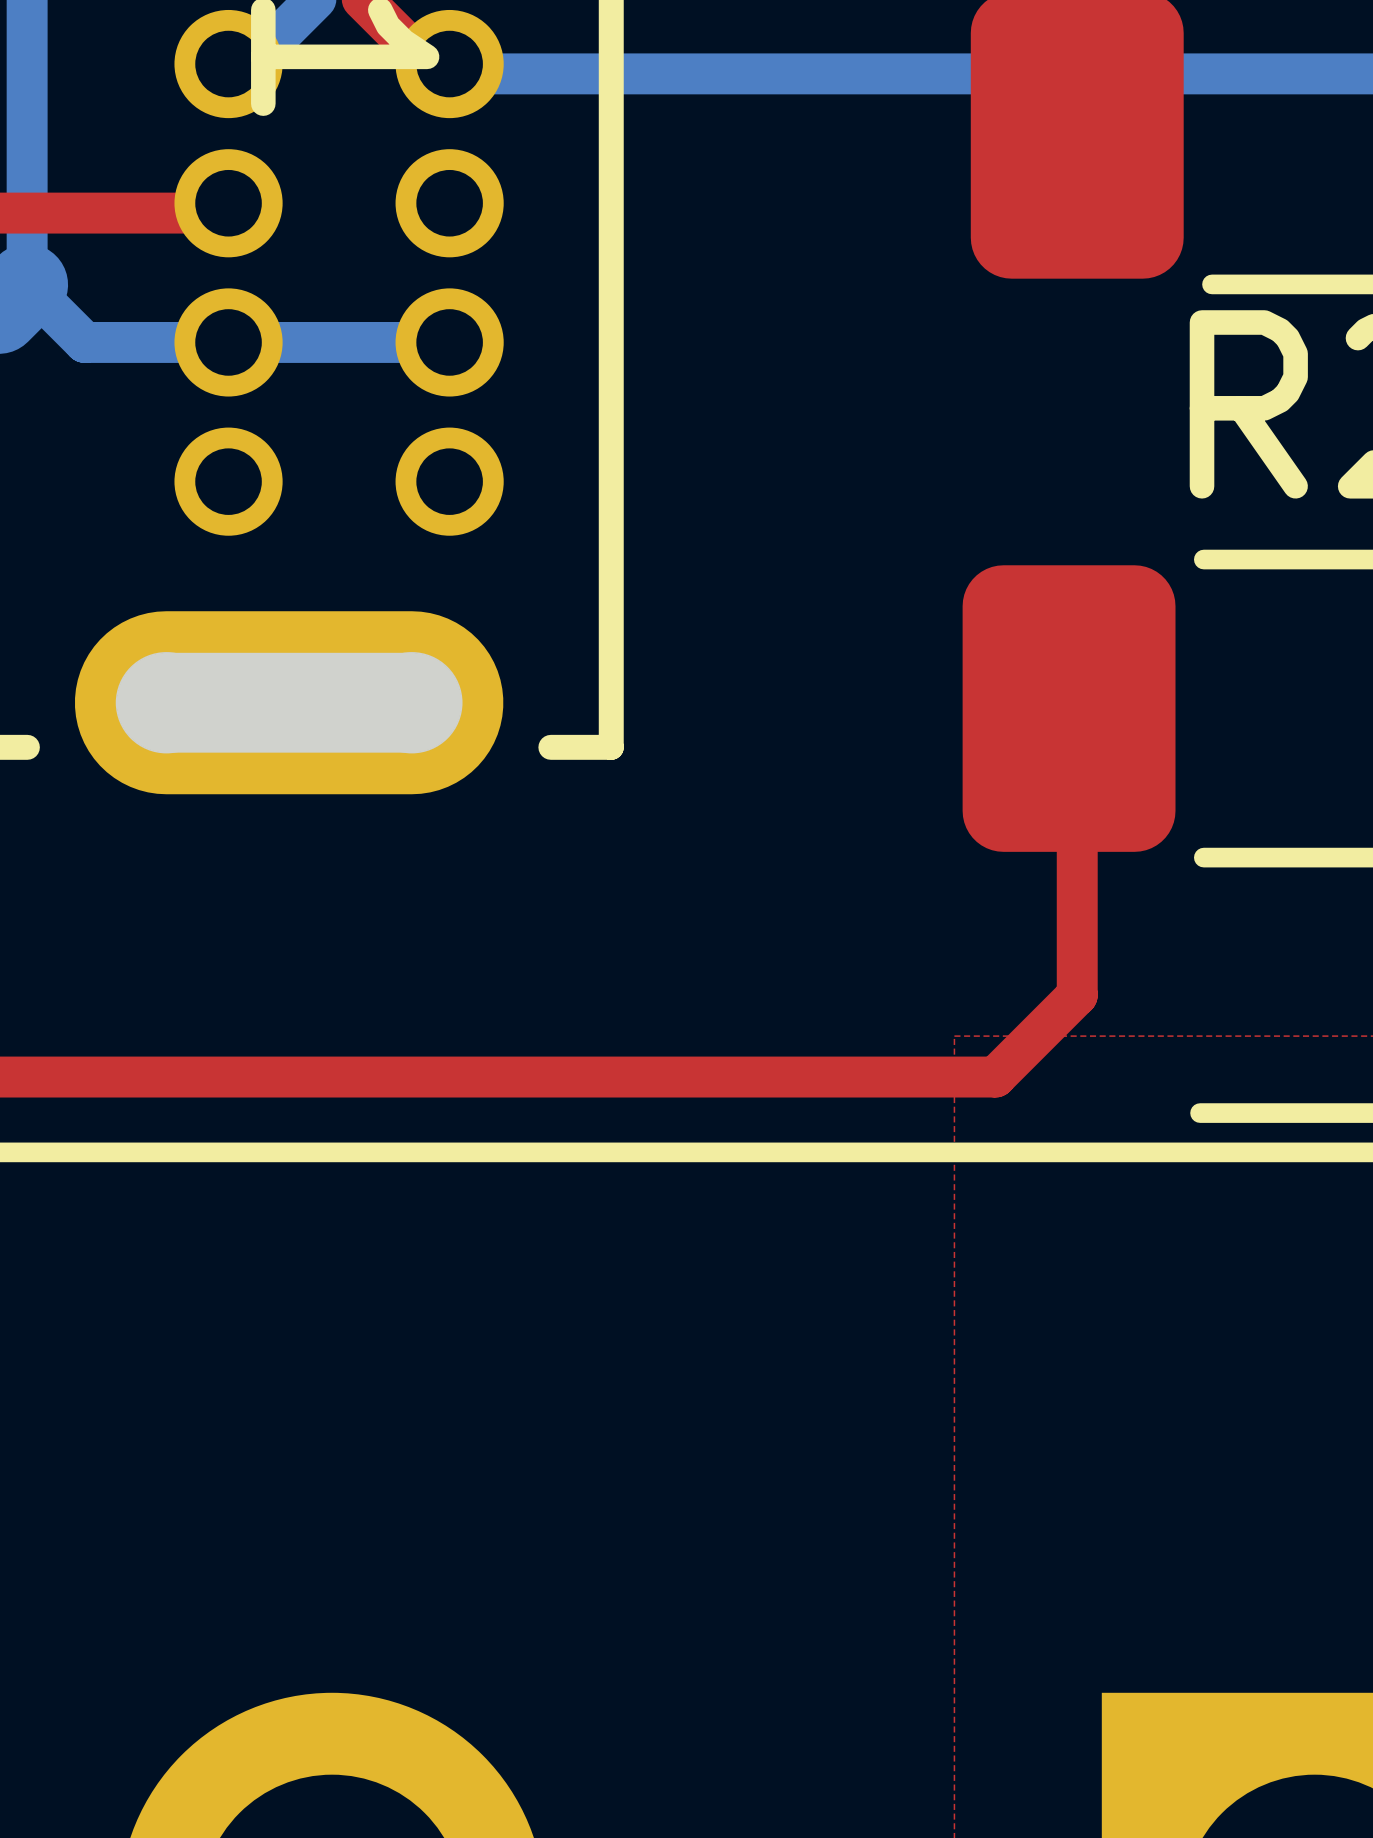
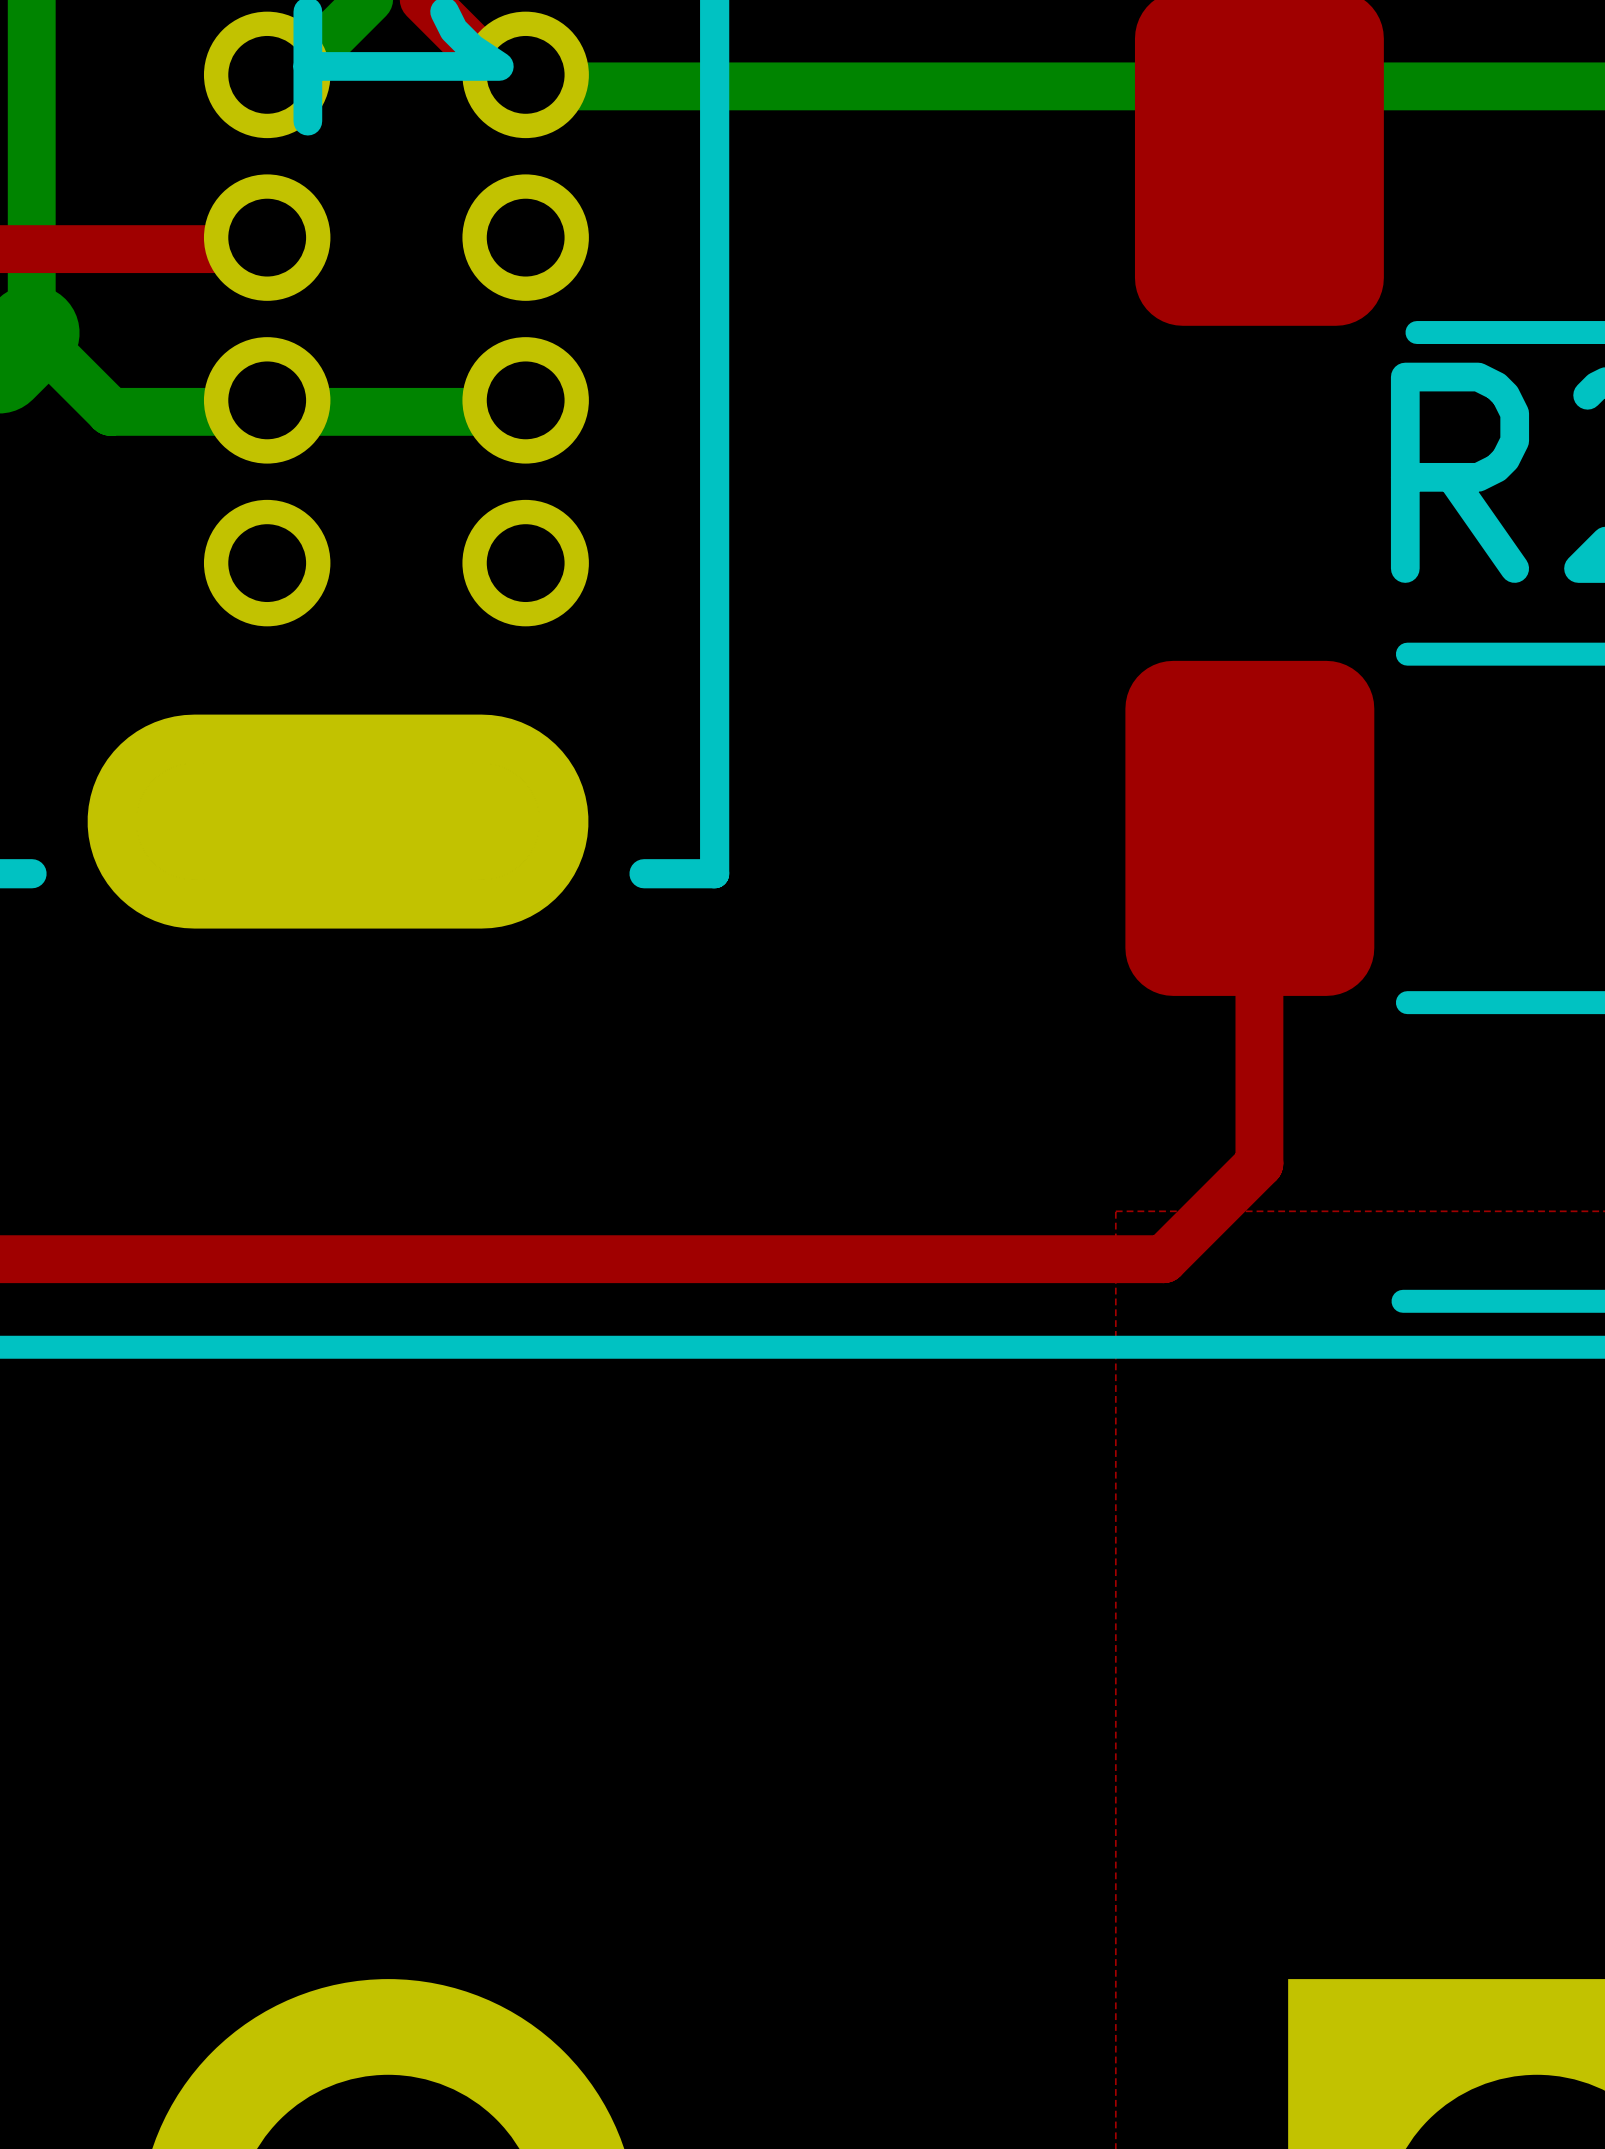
bottom track: (84, 342) (439, 342) -> (99, 400) (110, 411) (525, 411)

